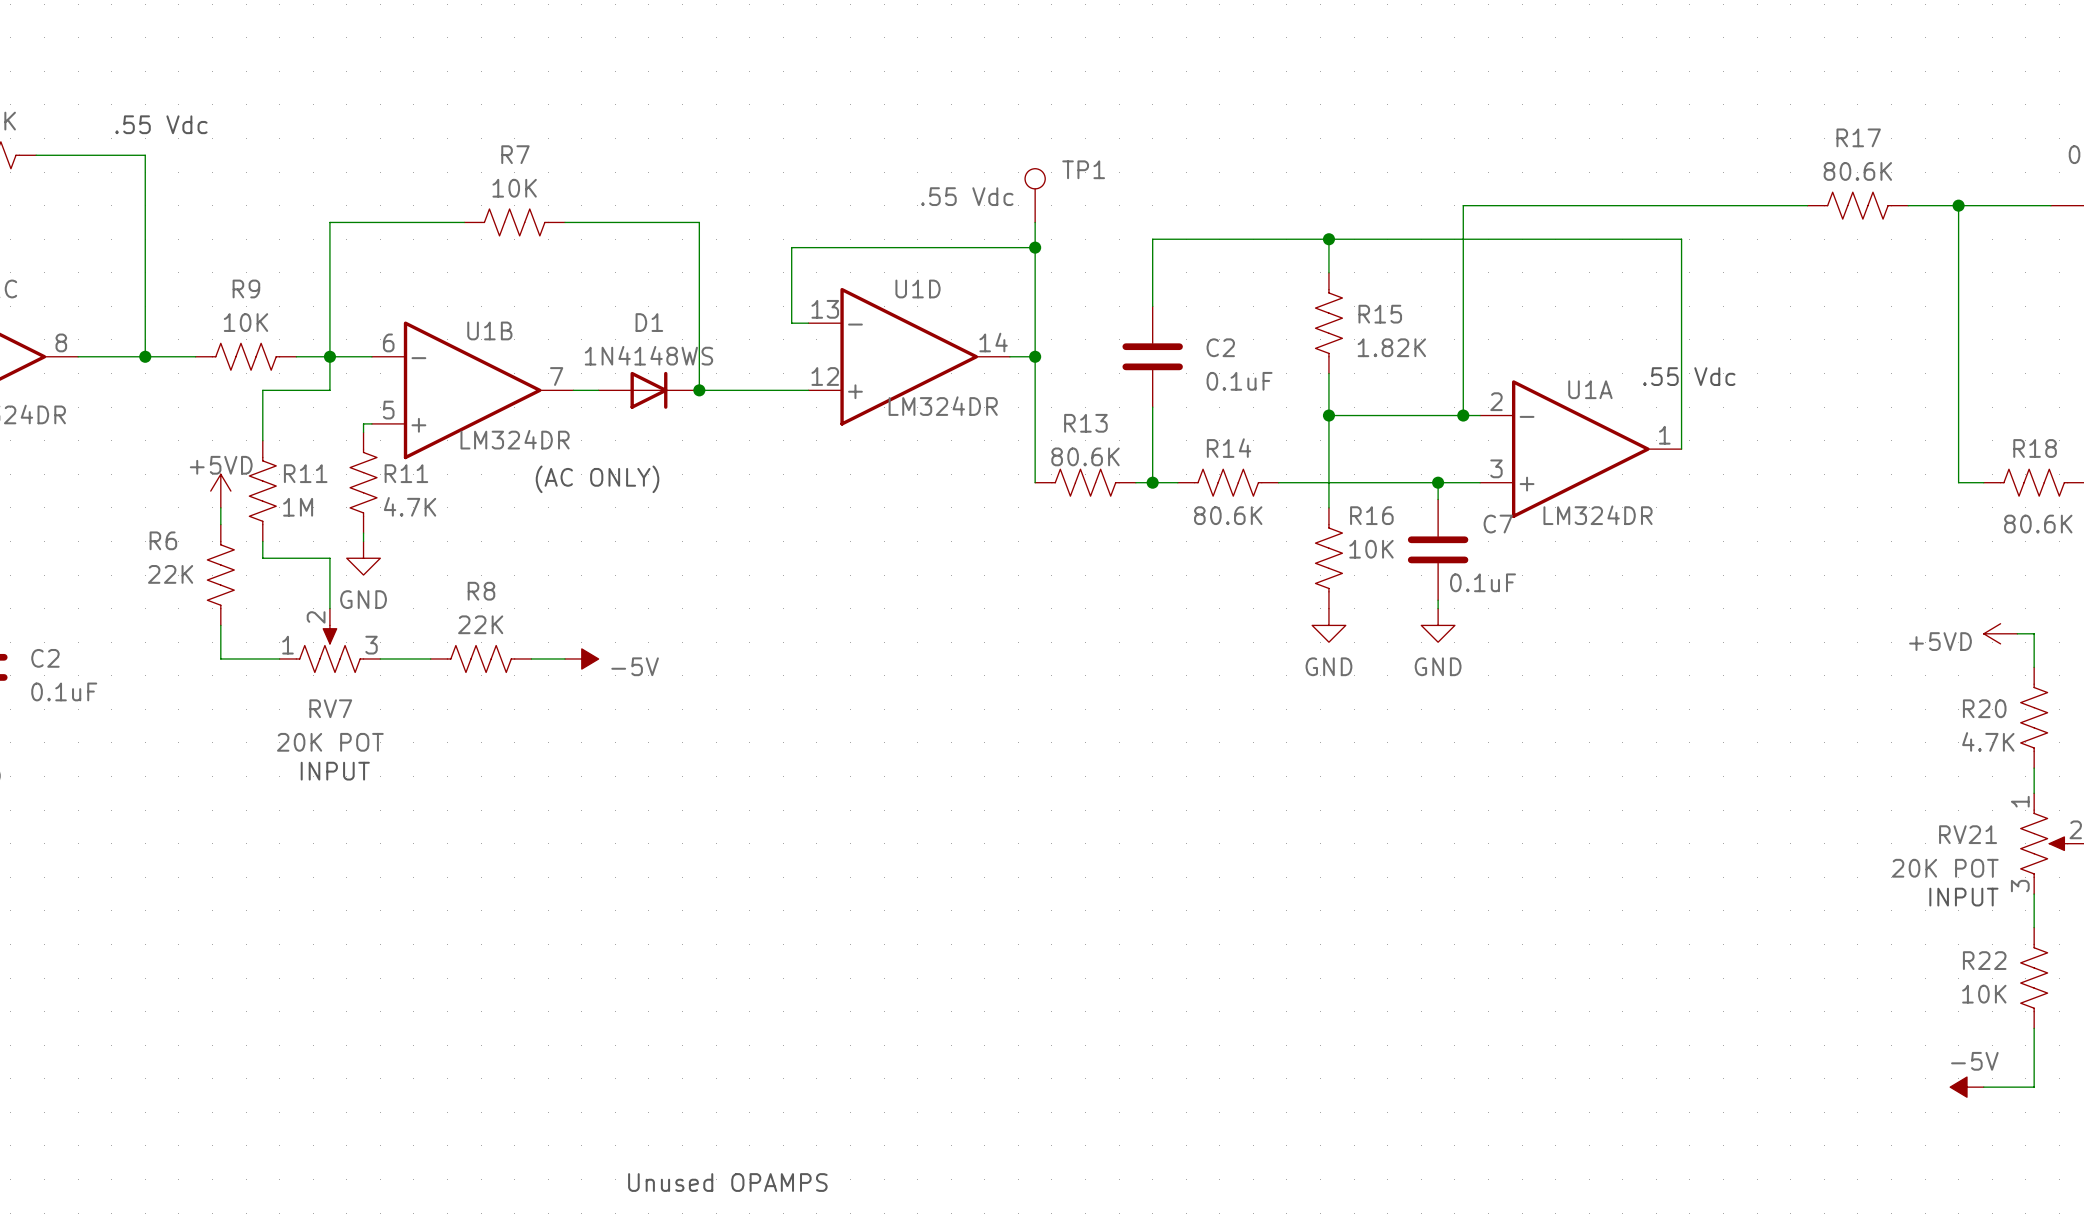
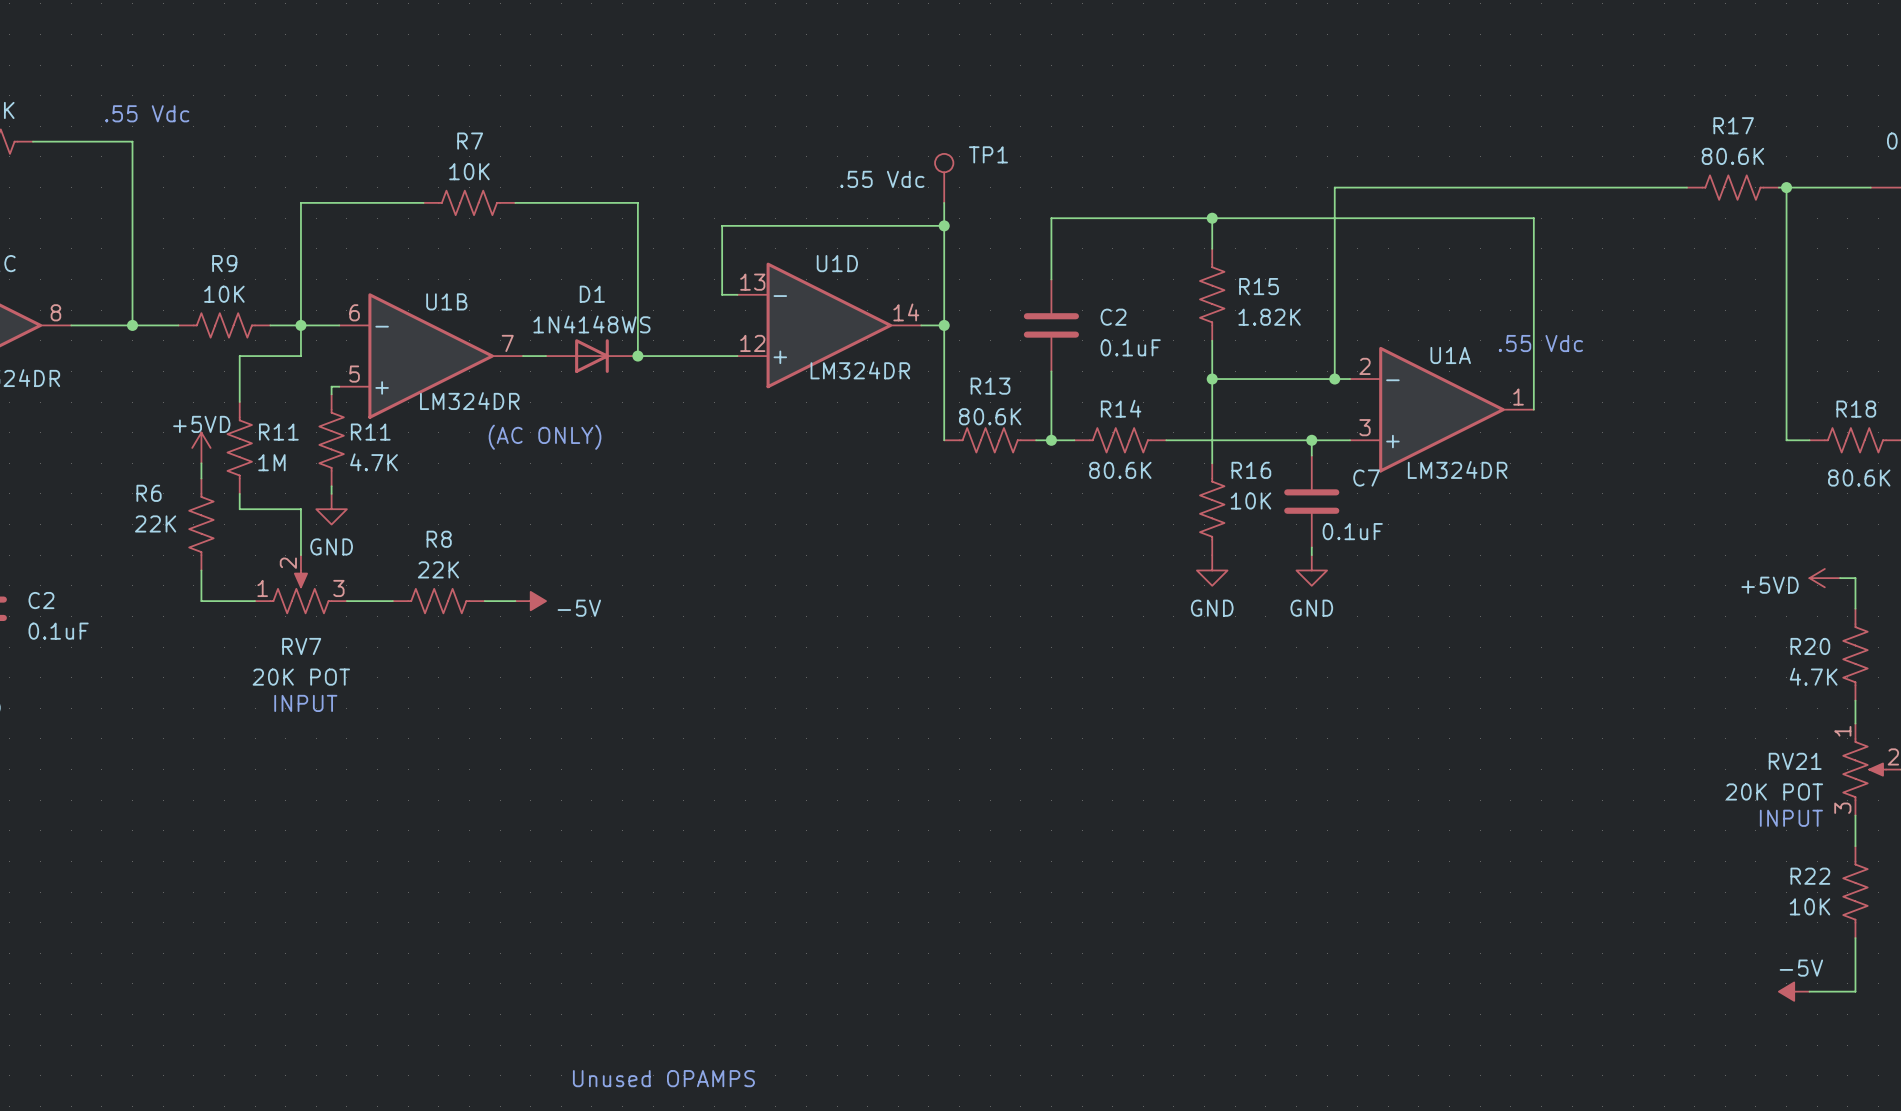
R17 position: (1857, 205) -> (1732, 187)

